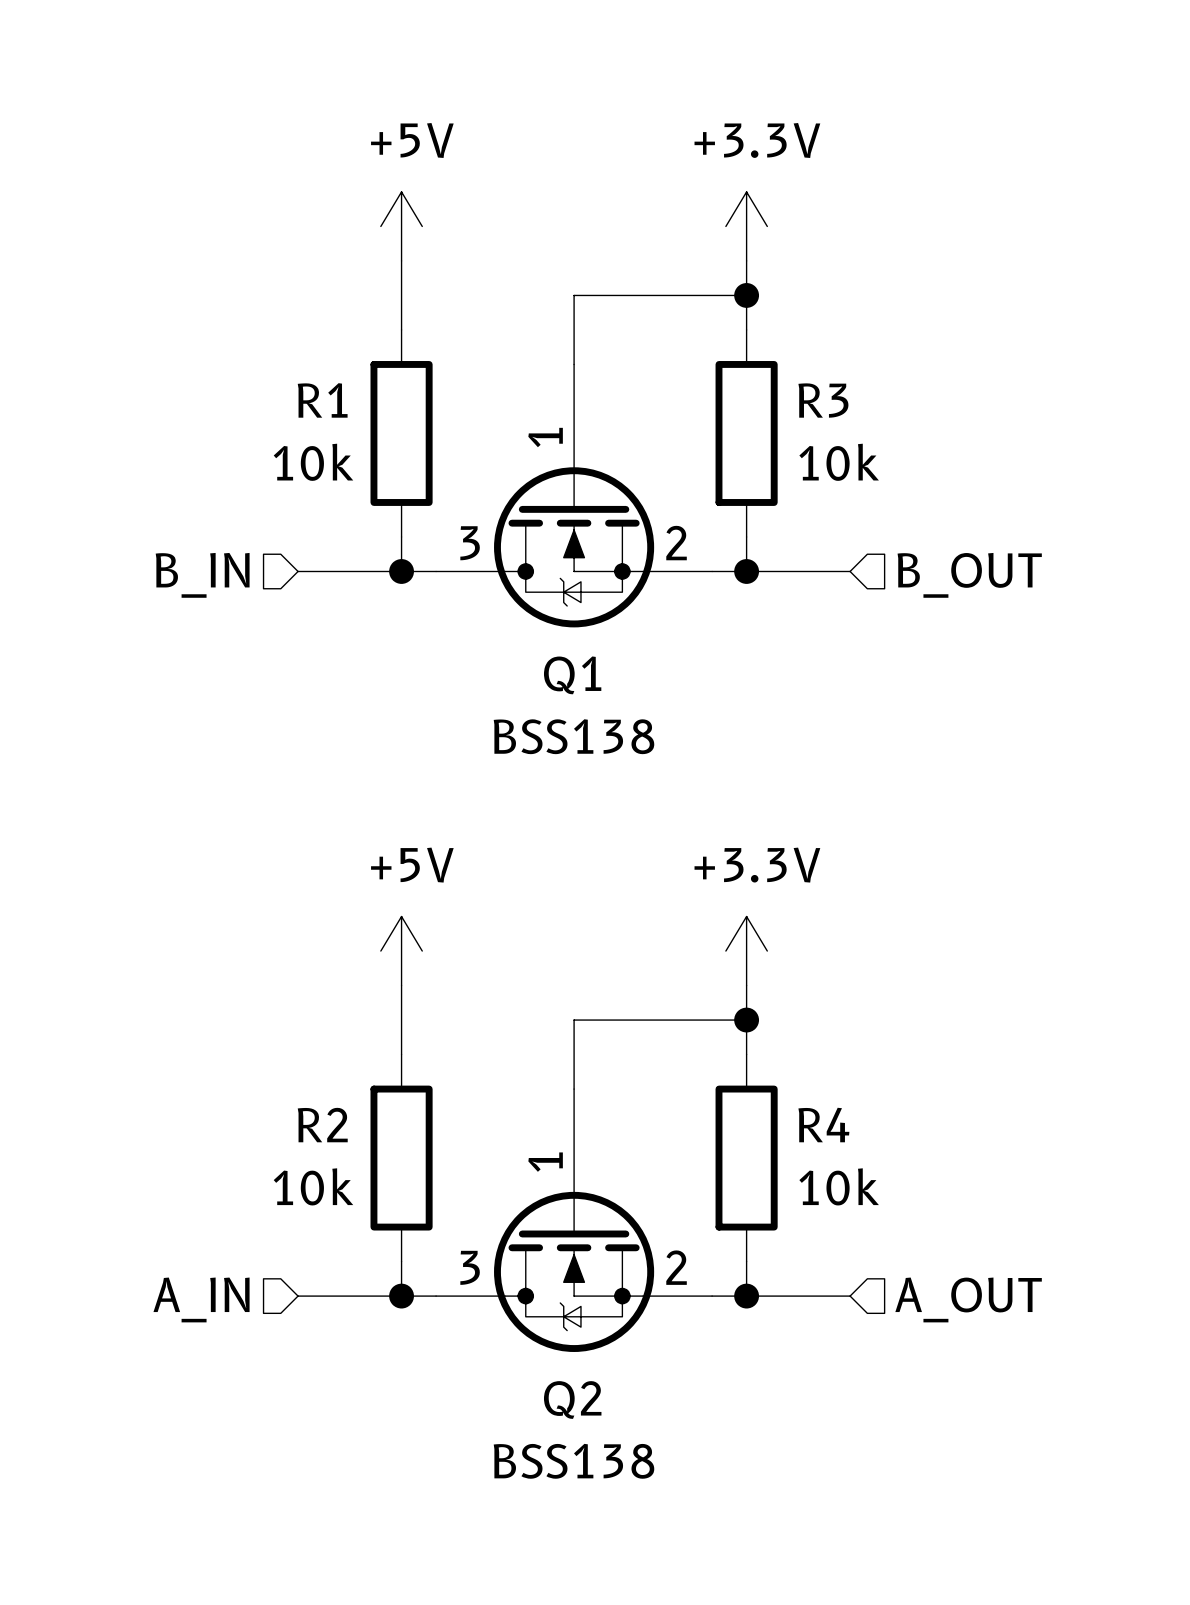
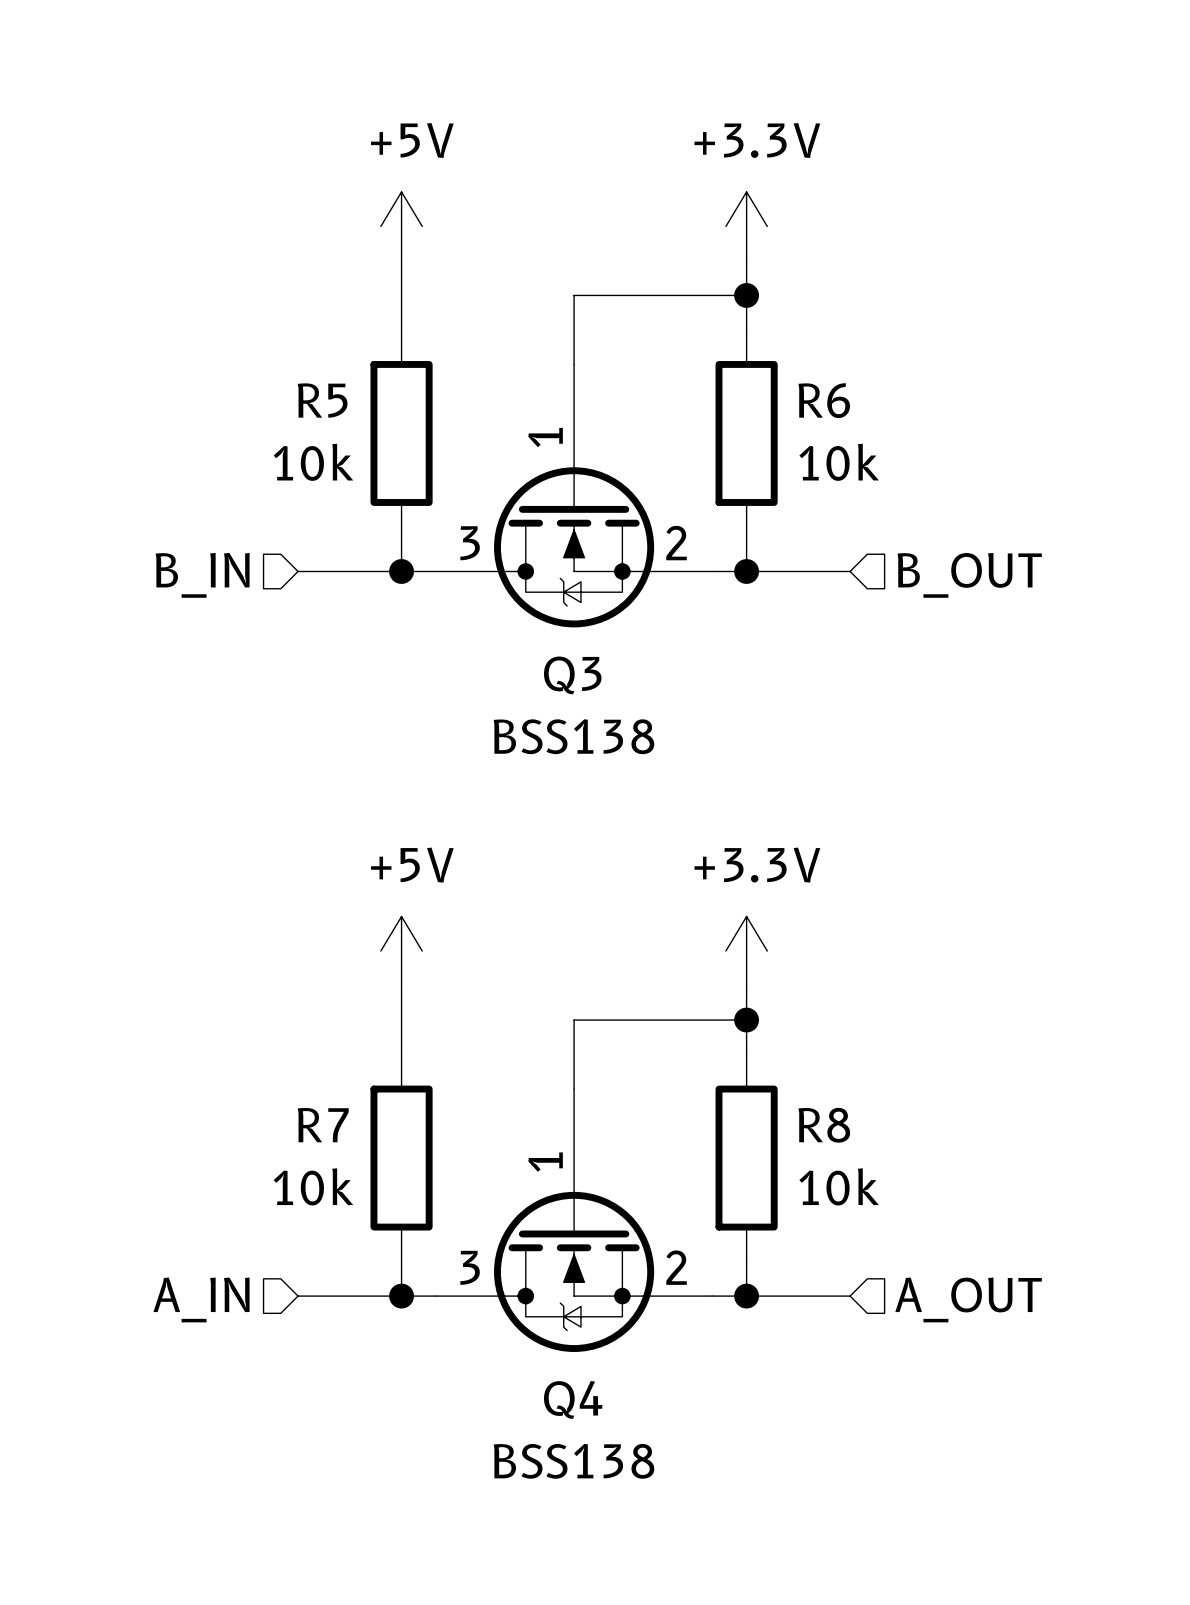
R1 name: R1 (322, 400) -> R5 (322, 400)
R3 name: R3 (823, 400) -> R6 (824, 400)
Q1 name: Q1 (572, 675) -> Q3 (572, 675)
R2 name: R2 (322, 1125) -> R7 (323, 1125)
R4 name: R4 (823, 1125) -> R8 (824, 1125)
Q2 name: Q2 (572, 1399) -> Q4 (573, 1399)

